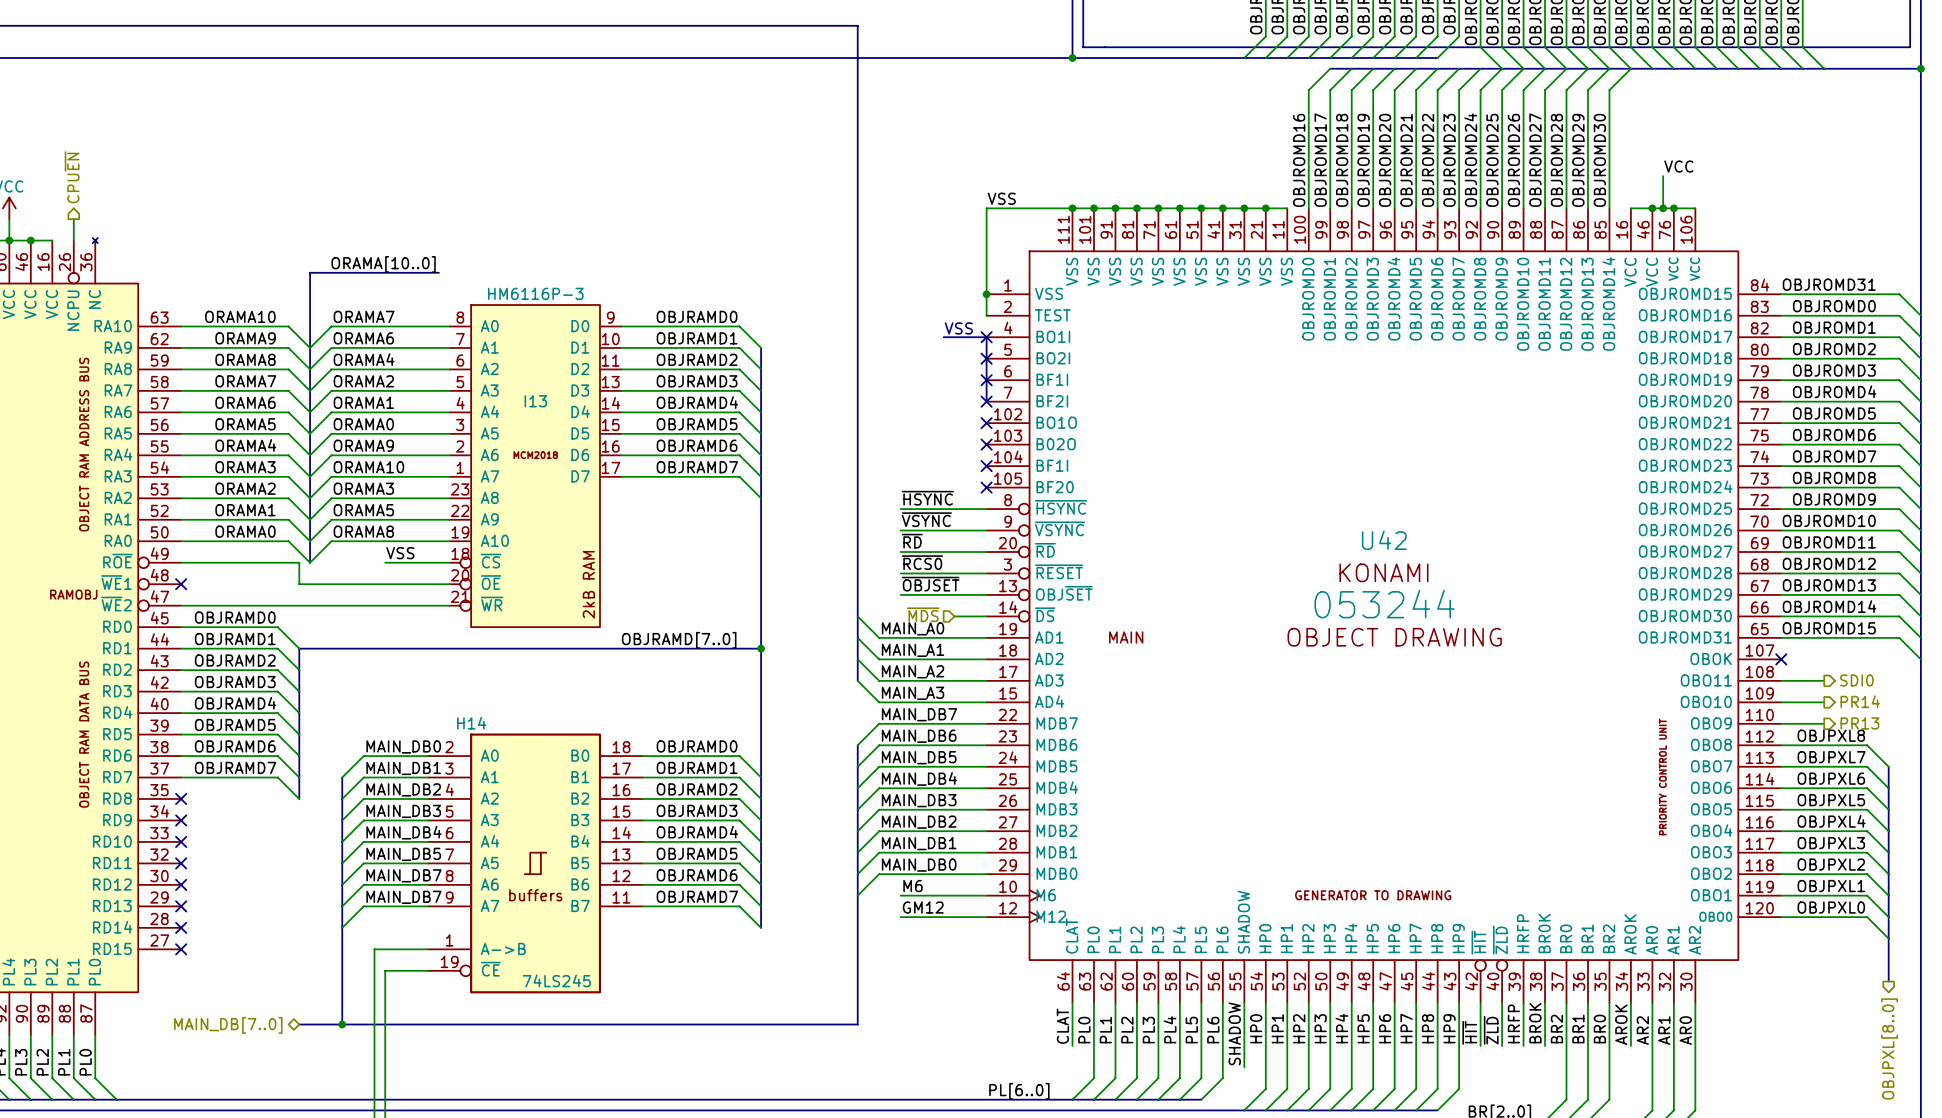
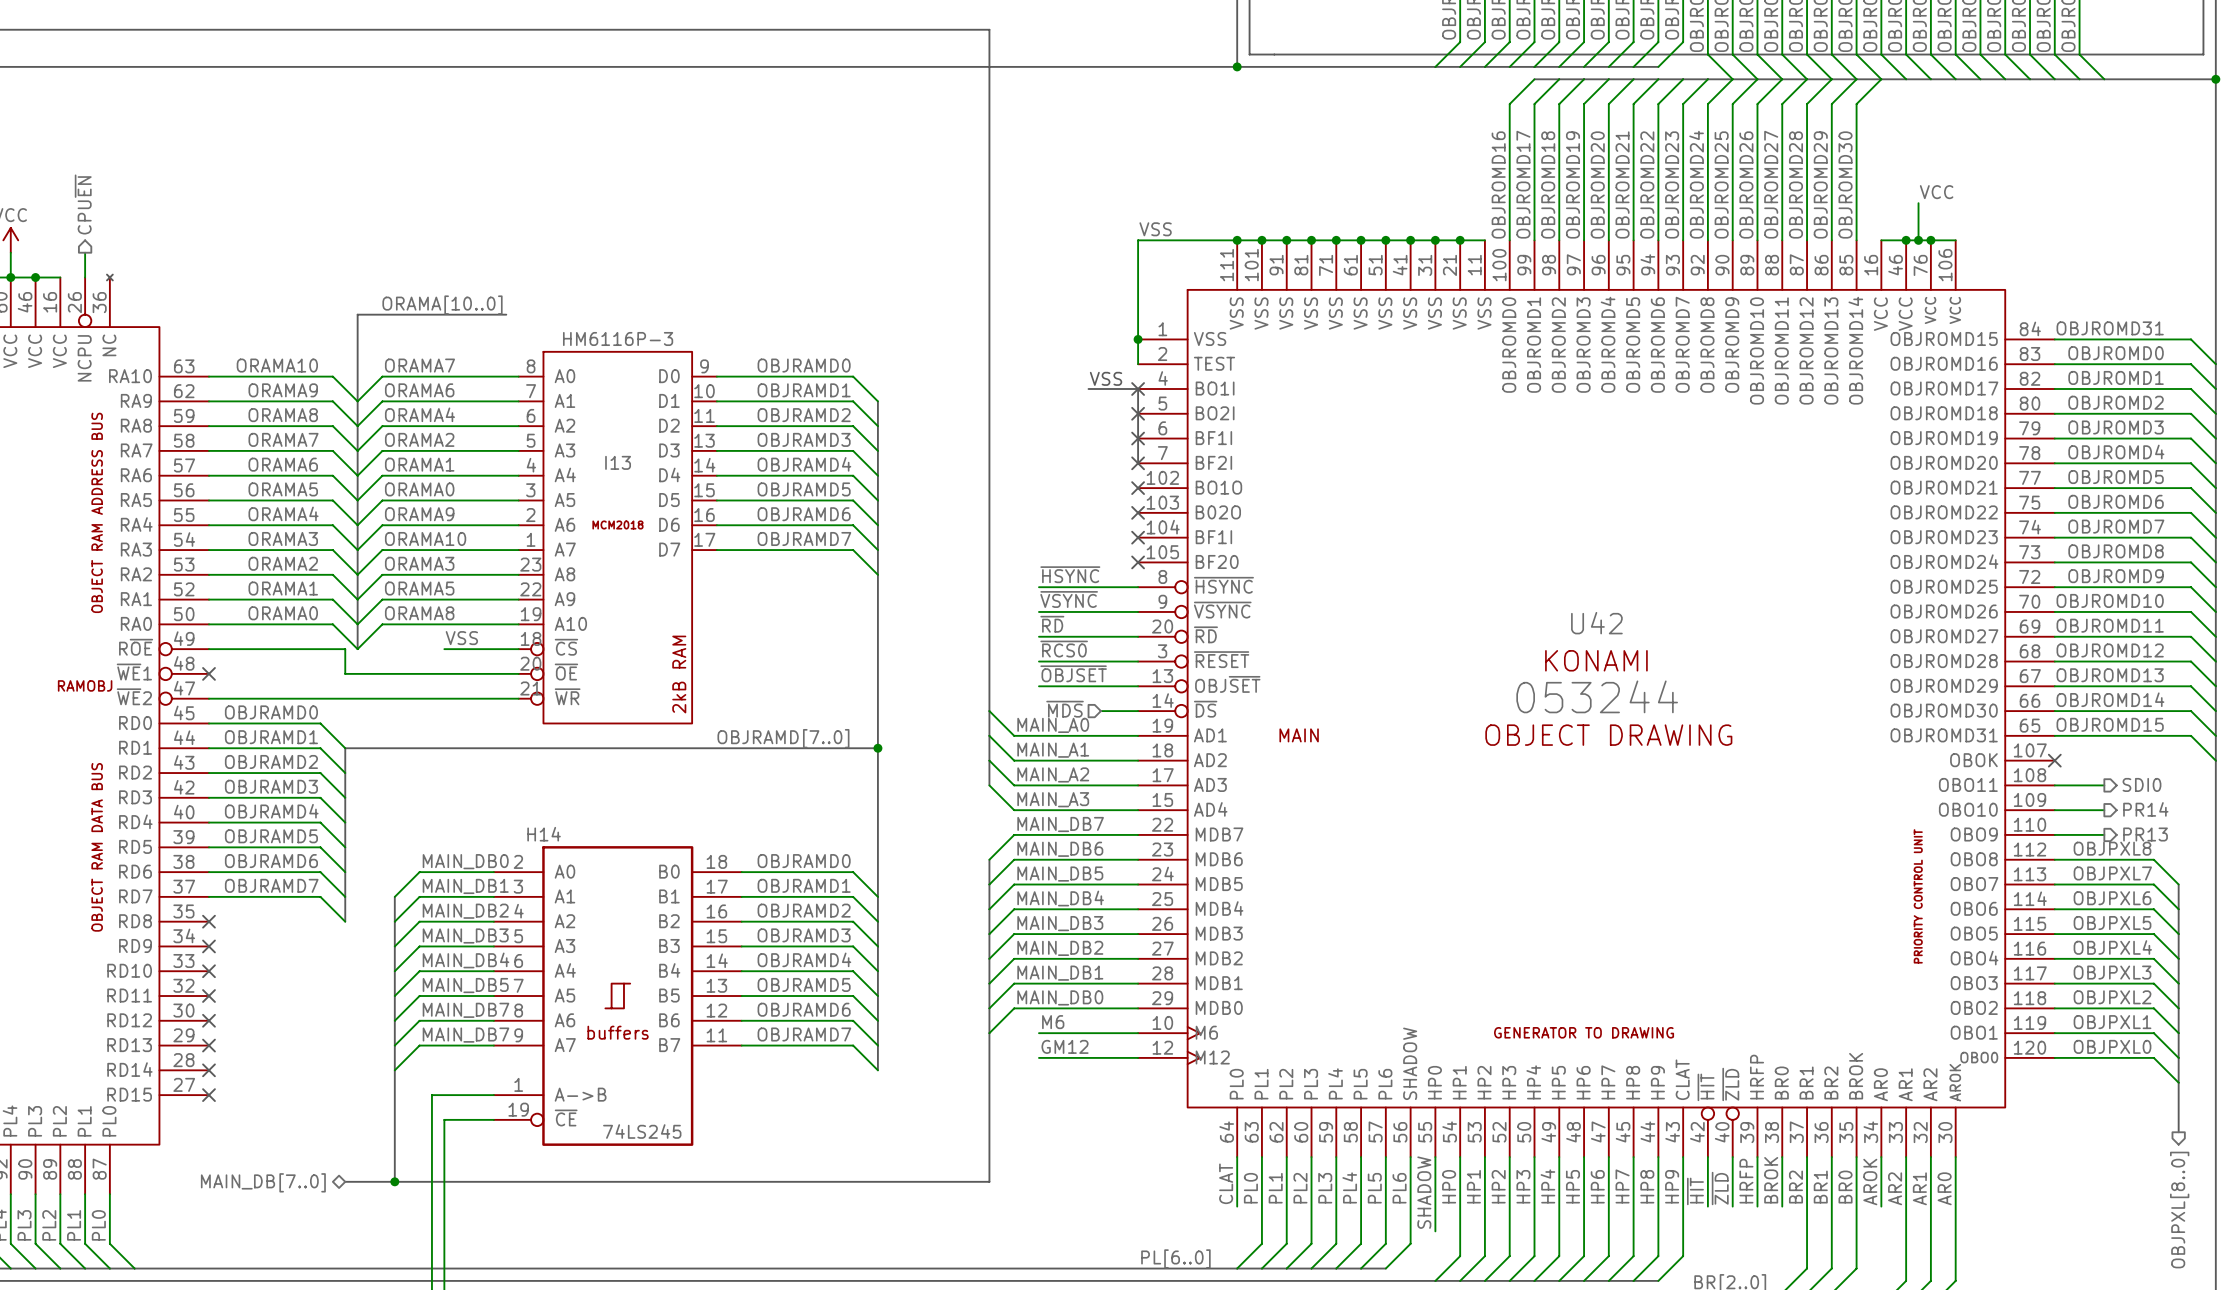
U42 symbol: [986, 208, 1782, 1004] -> [1138, 240, 2055, 1158]

